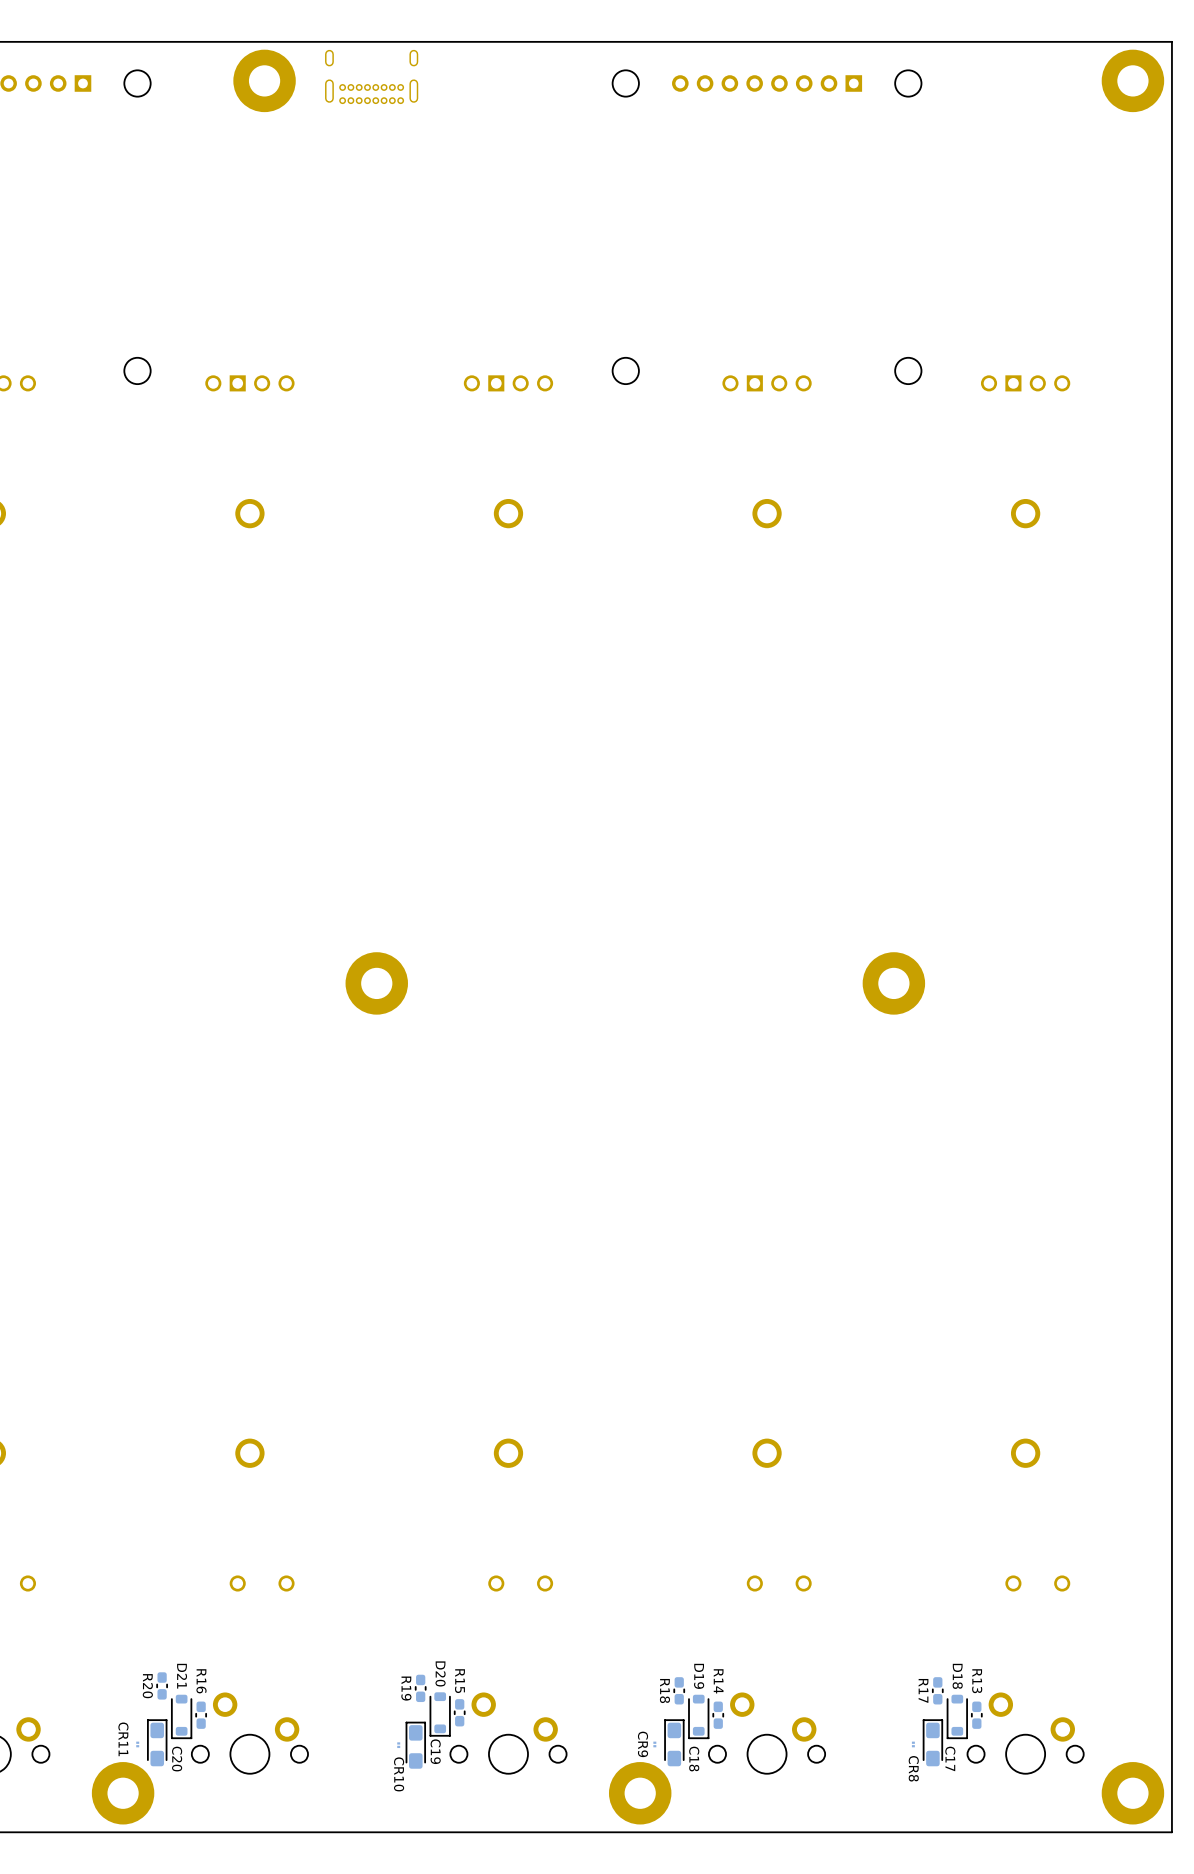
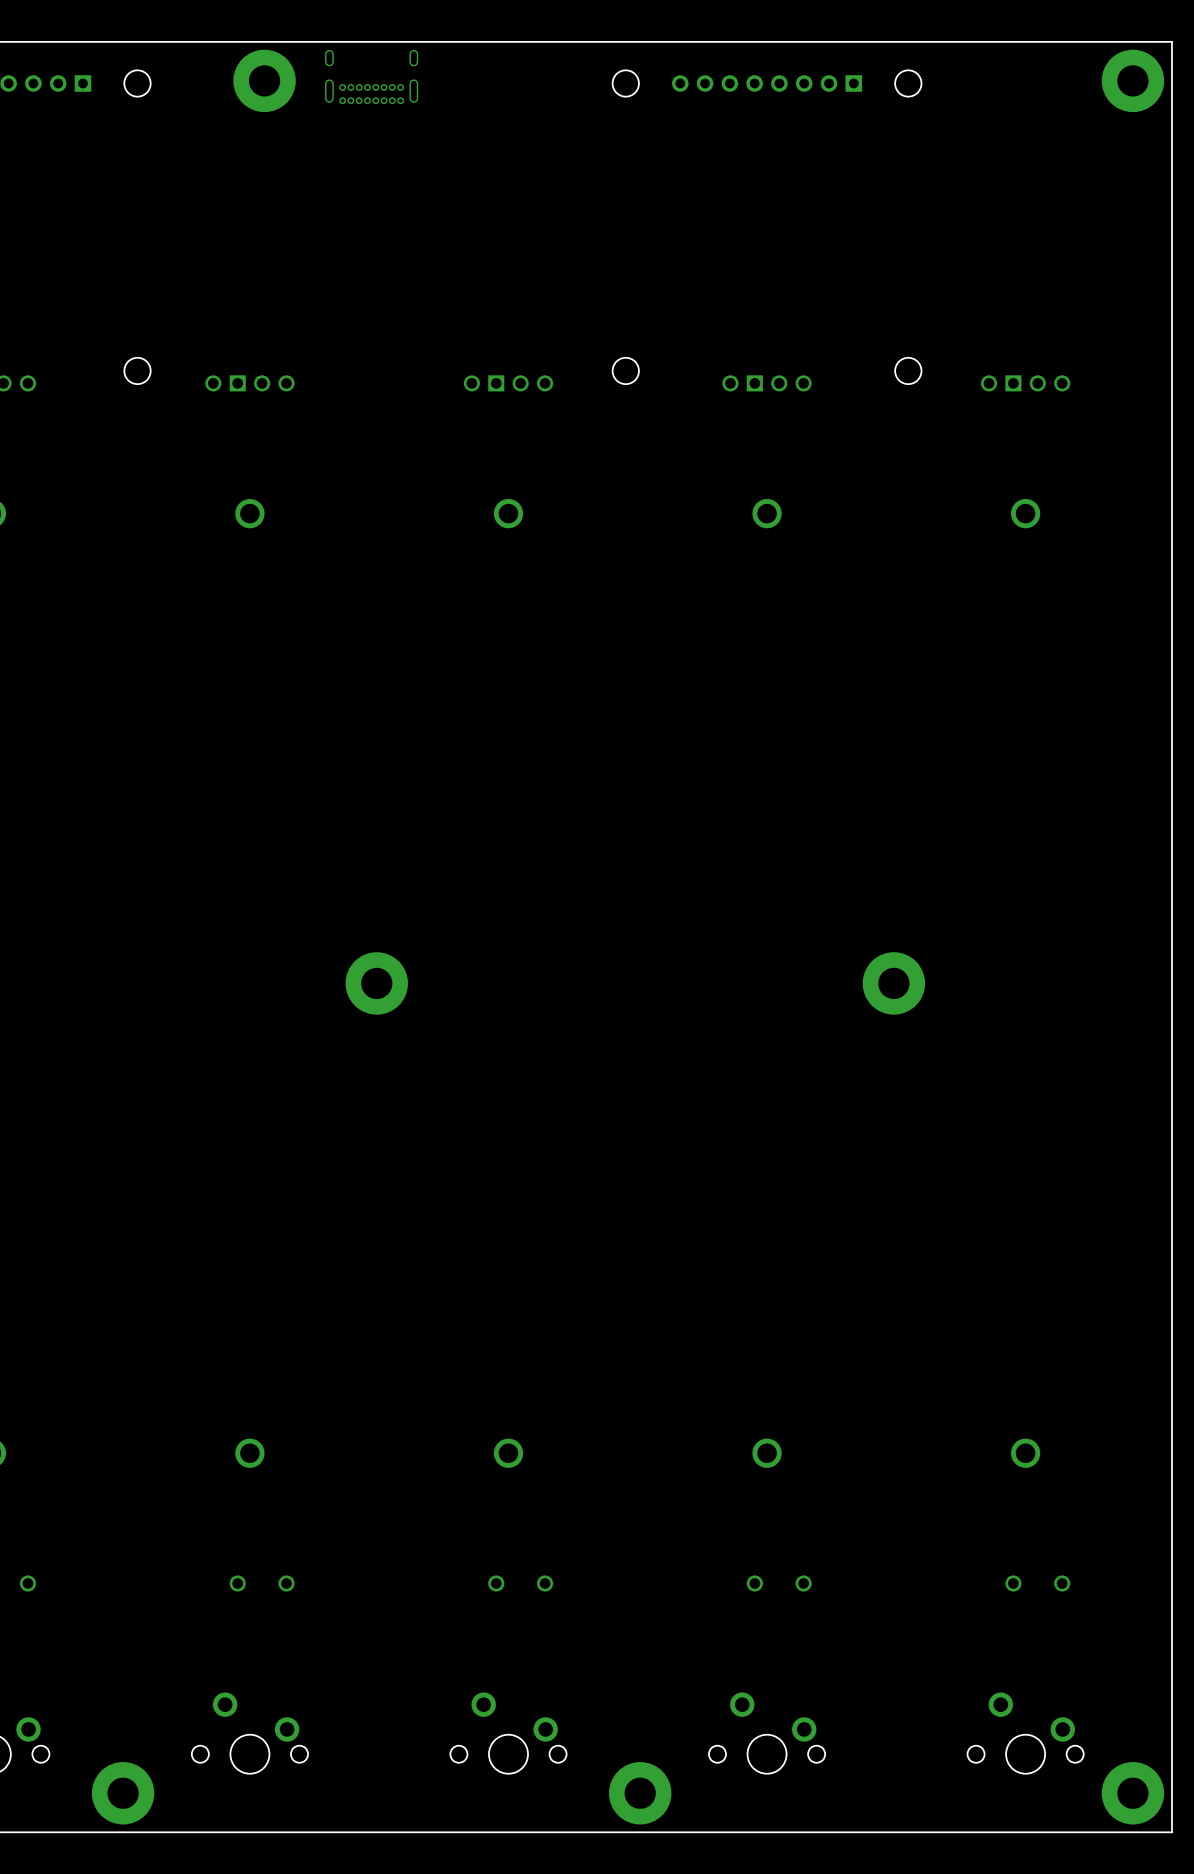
R20: (162, 1685) -> none
R19: (420, 1688) -> none
R18: (679, 1690) -> none
R17: (937, 1690) -> none
R15: (459, 1712) -> none
D20: (440, 1714) -> none
R16: (201, 1715) -> none
R14: (718, 1715) -> none
R13: (976, 1715) -> none
D21: (181, 1716) -> none
D19: (698, 1716) -> none
D18: (957, 1716) -> none
C20: (157, 1742) -> none
C18: (674, 1742) -> none
C17: (932, 1742) -> none
CR11: (137, 1744) -> none
CR9: (654, 1744) -> none
CR8: (913, 1744) -> none
CR10: (398, 1745) -> none
C19: (415, 1745) -> none

